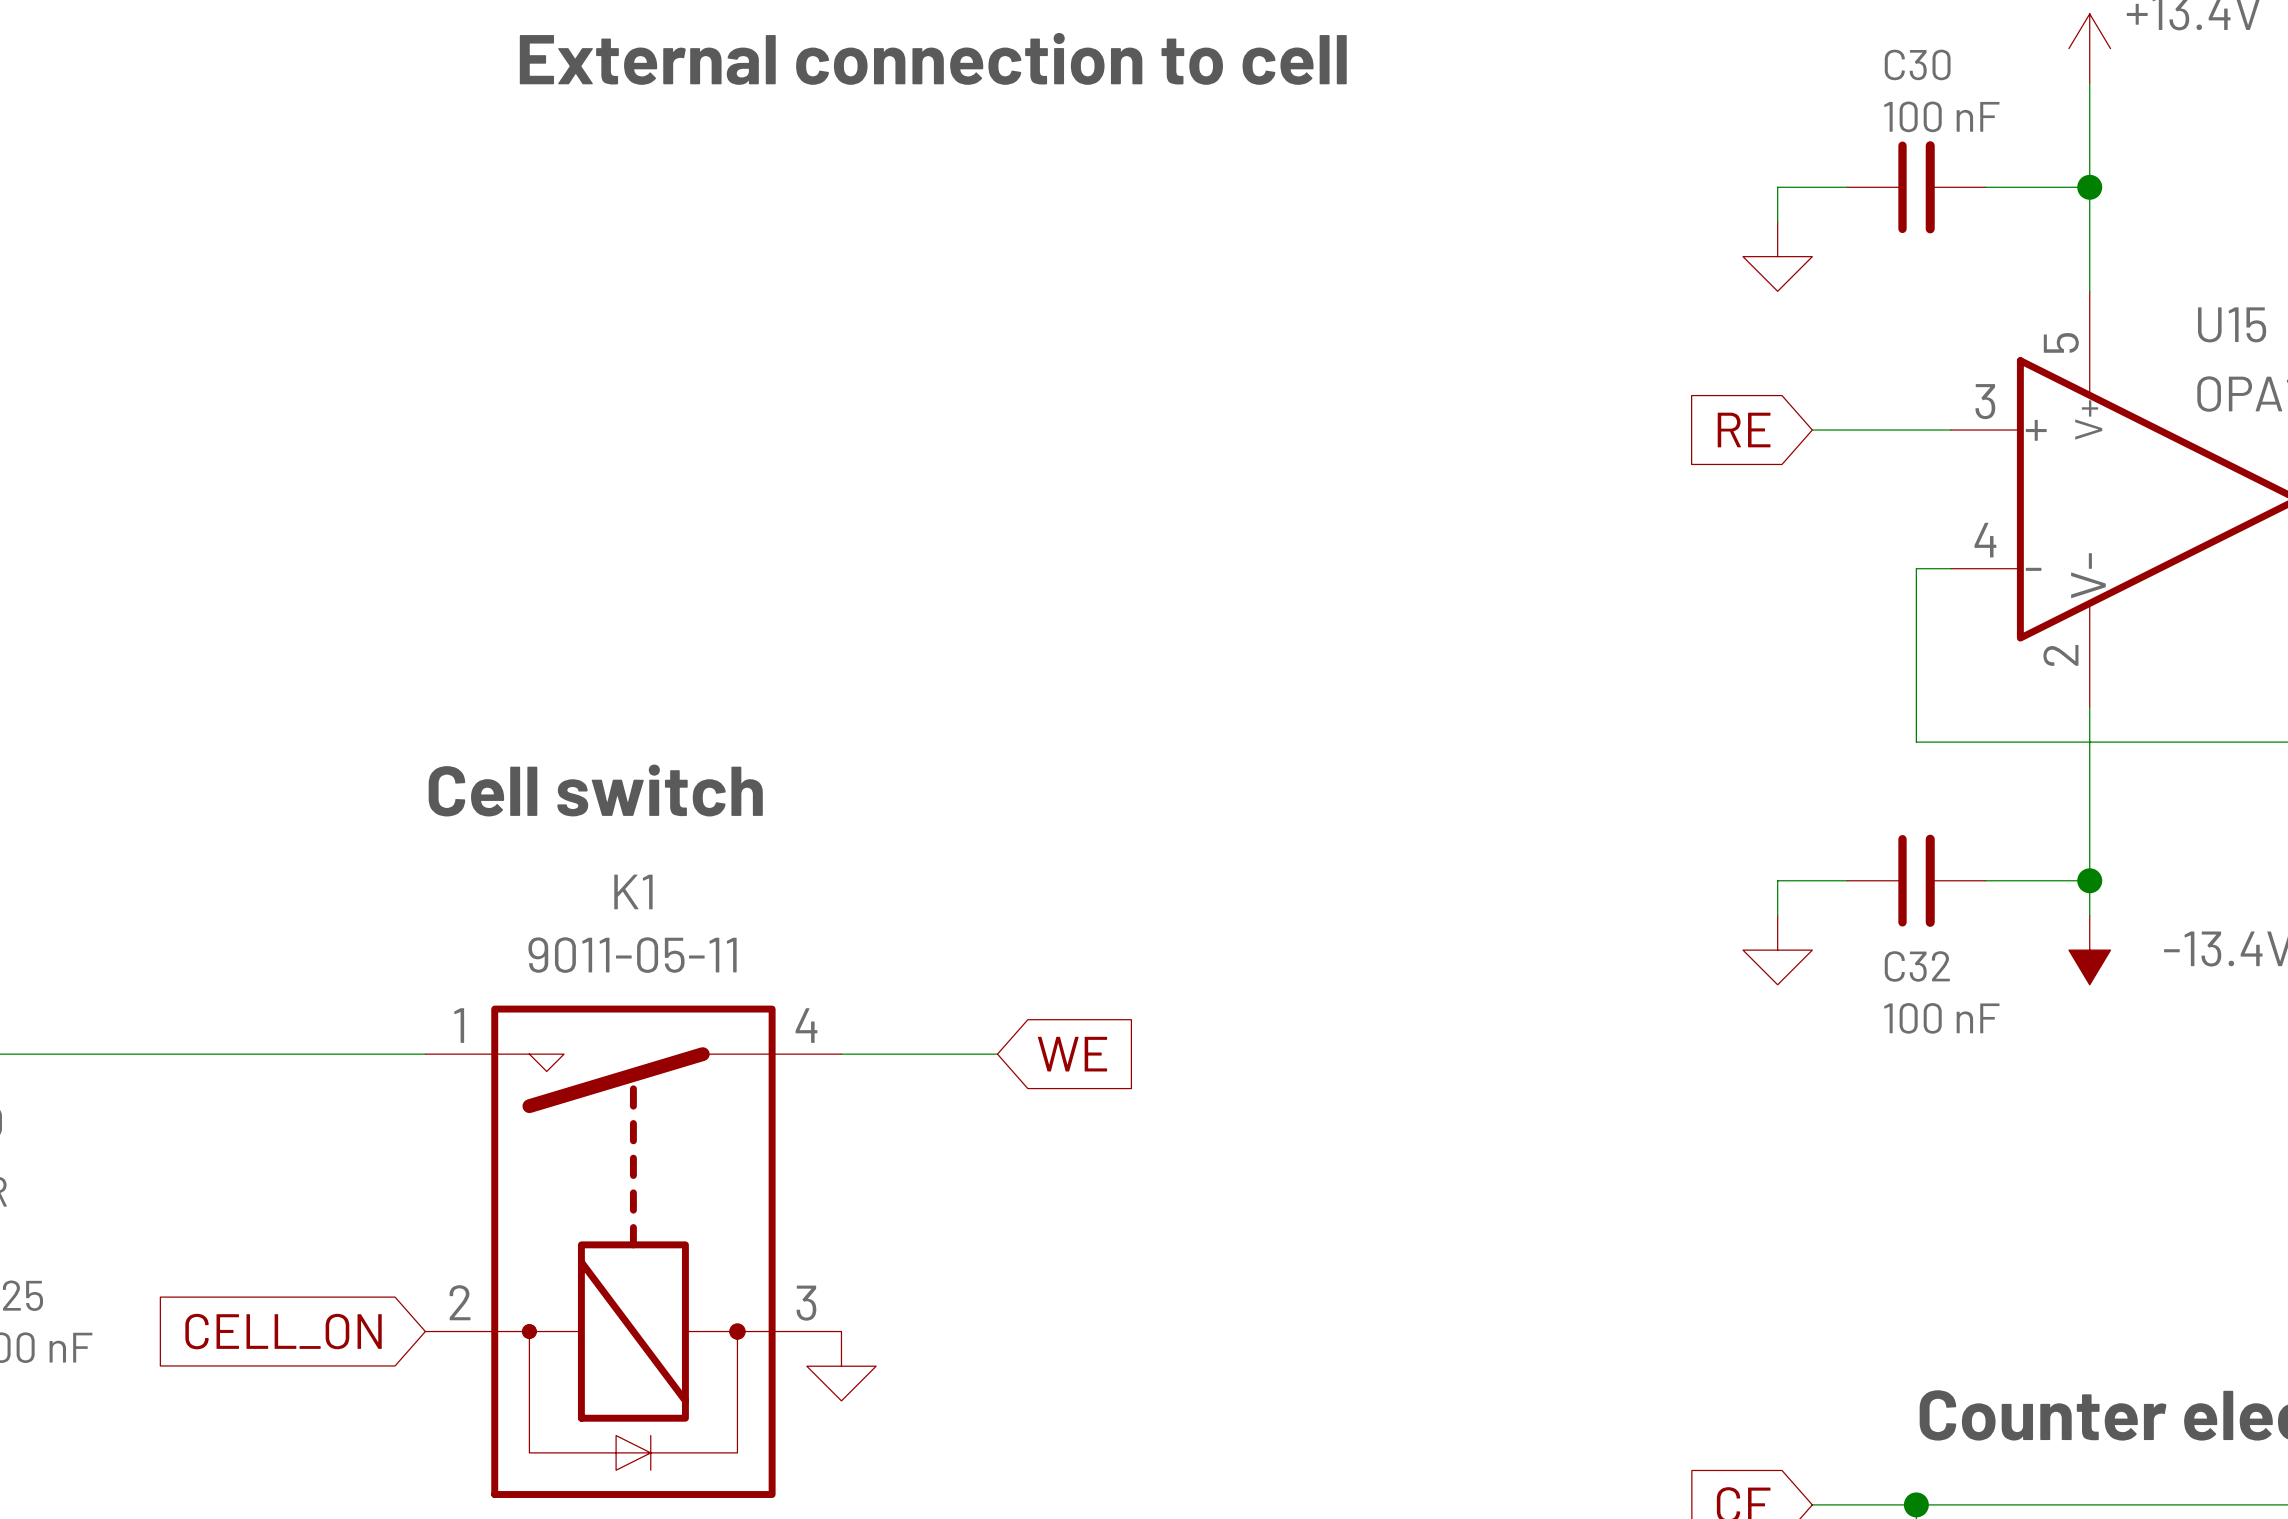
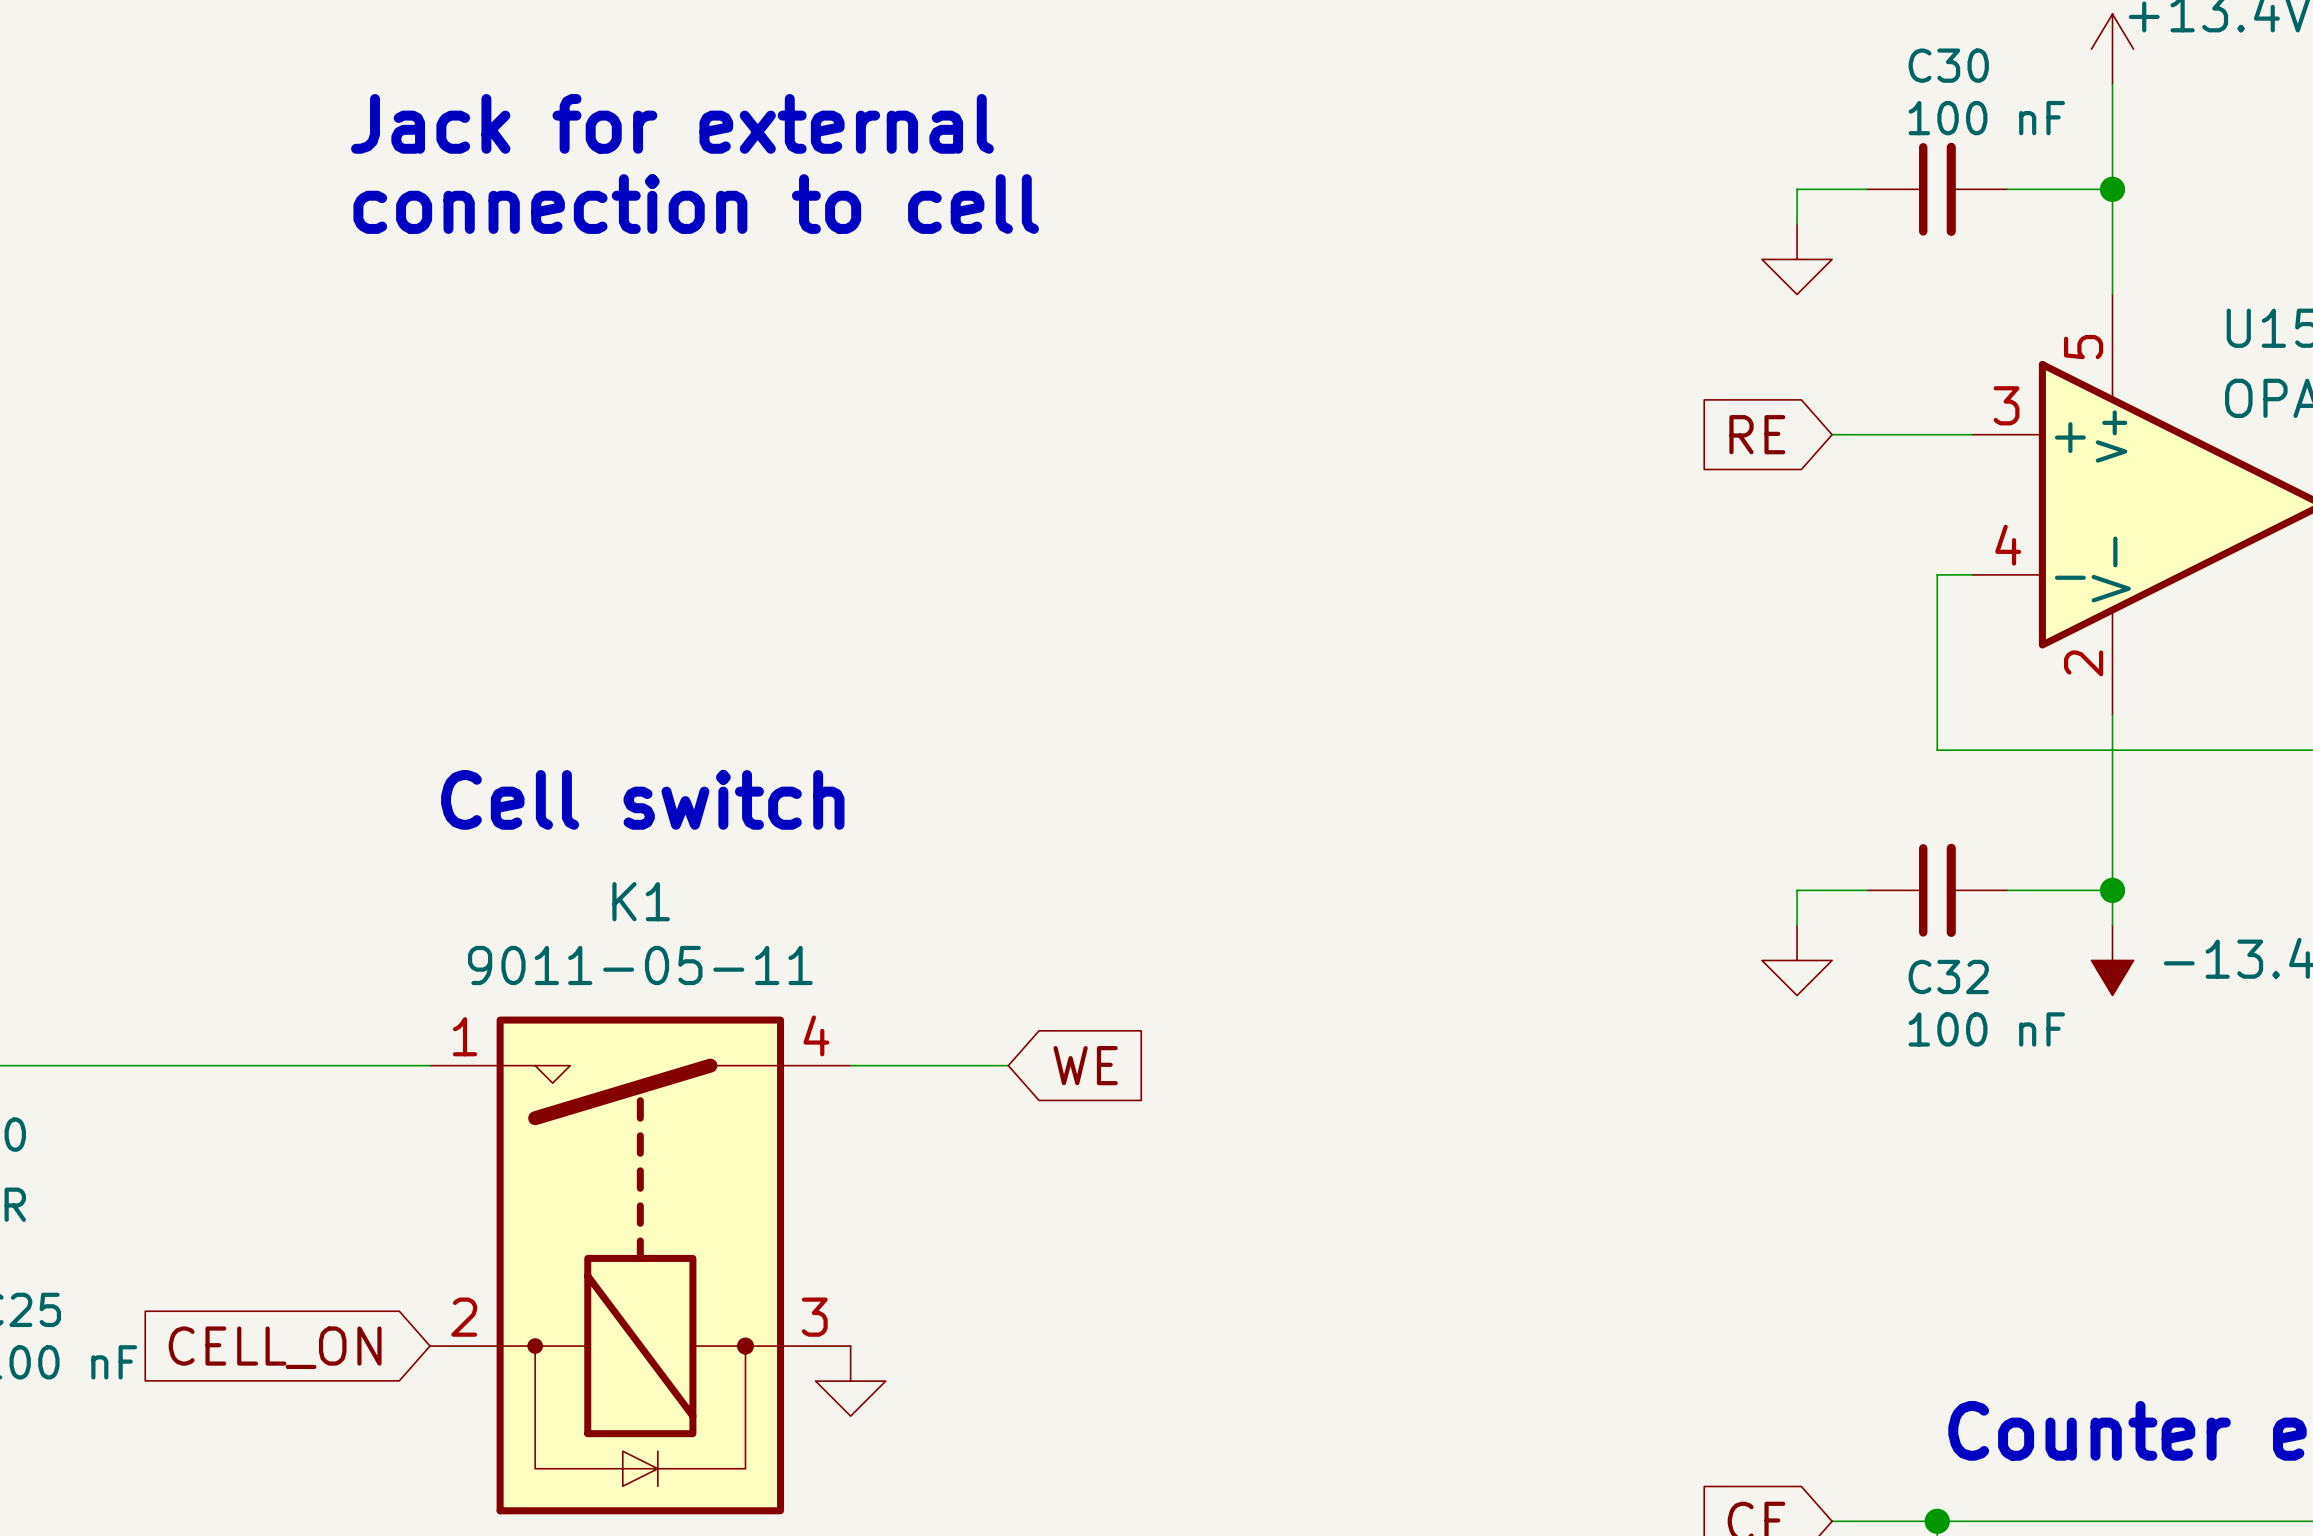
text: External connection to cell (933, 58) -> none
text: none -> Jack for external (672, 123)
text: none -> connection to cell (696, 204)

